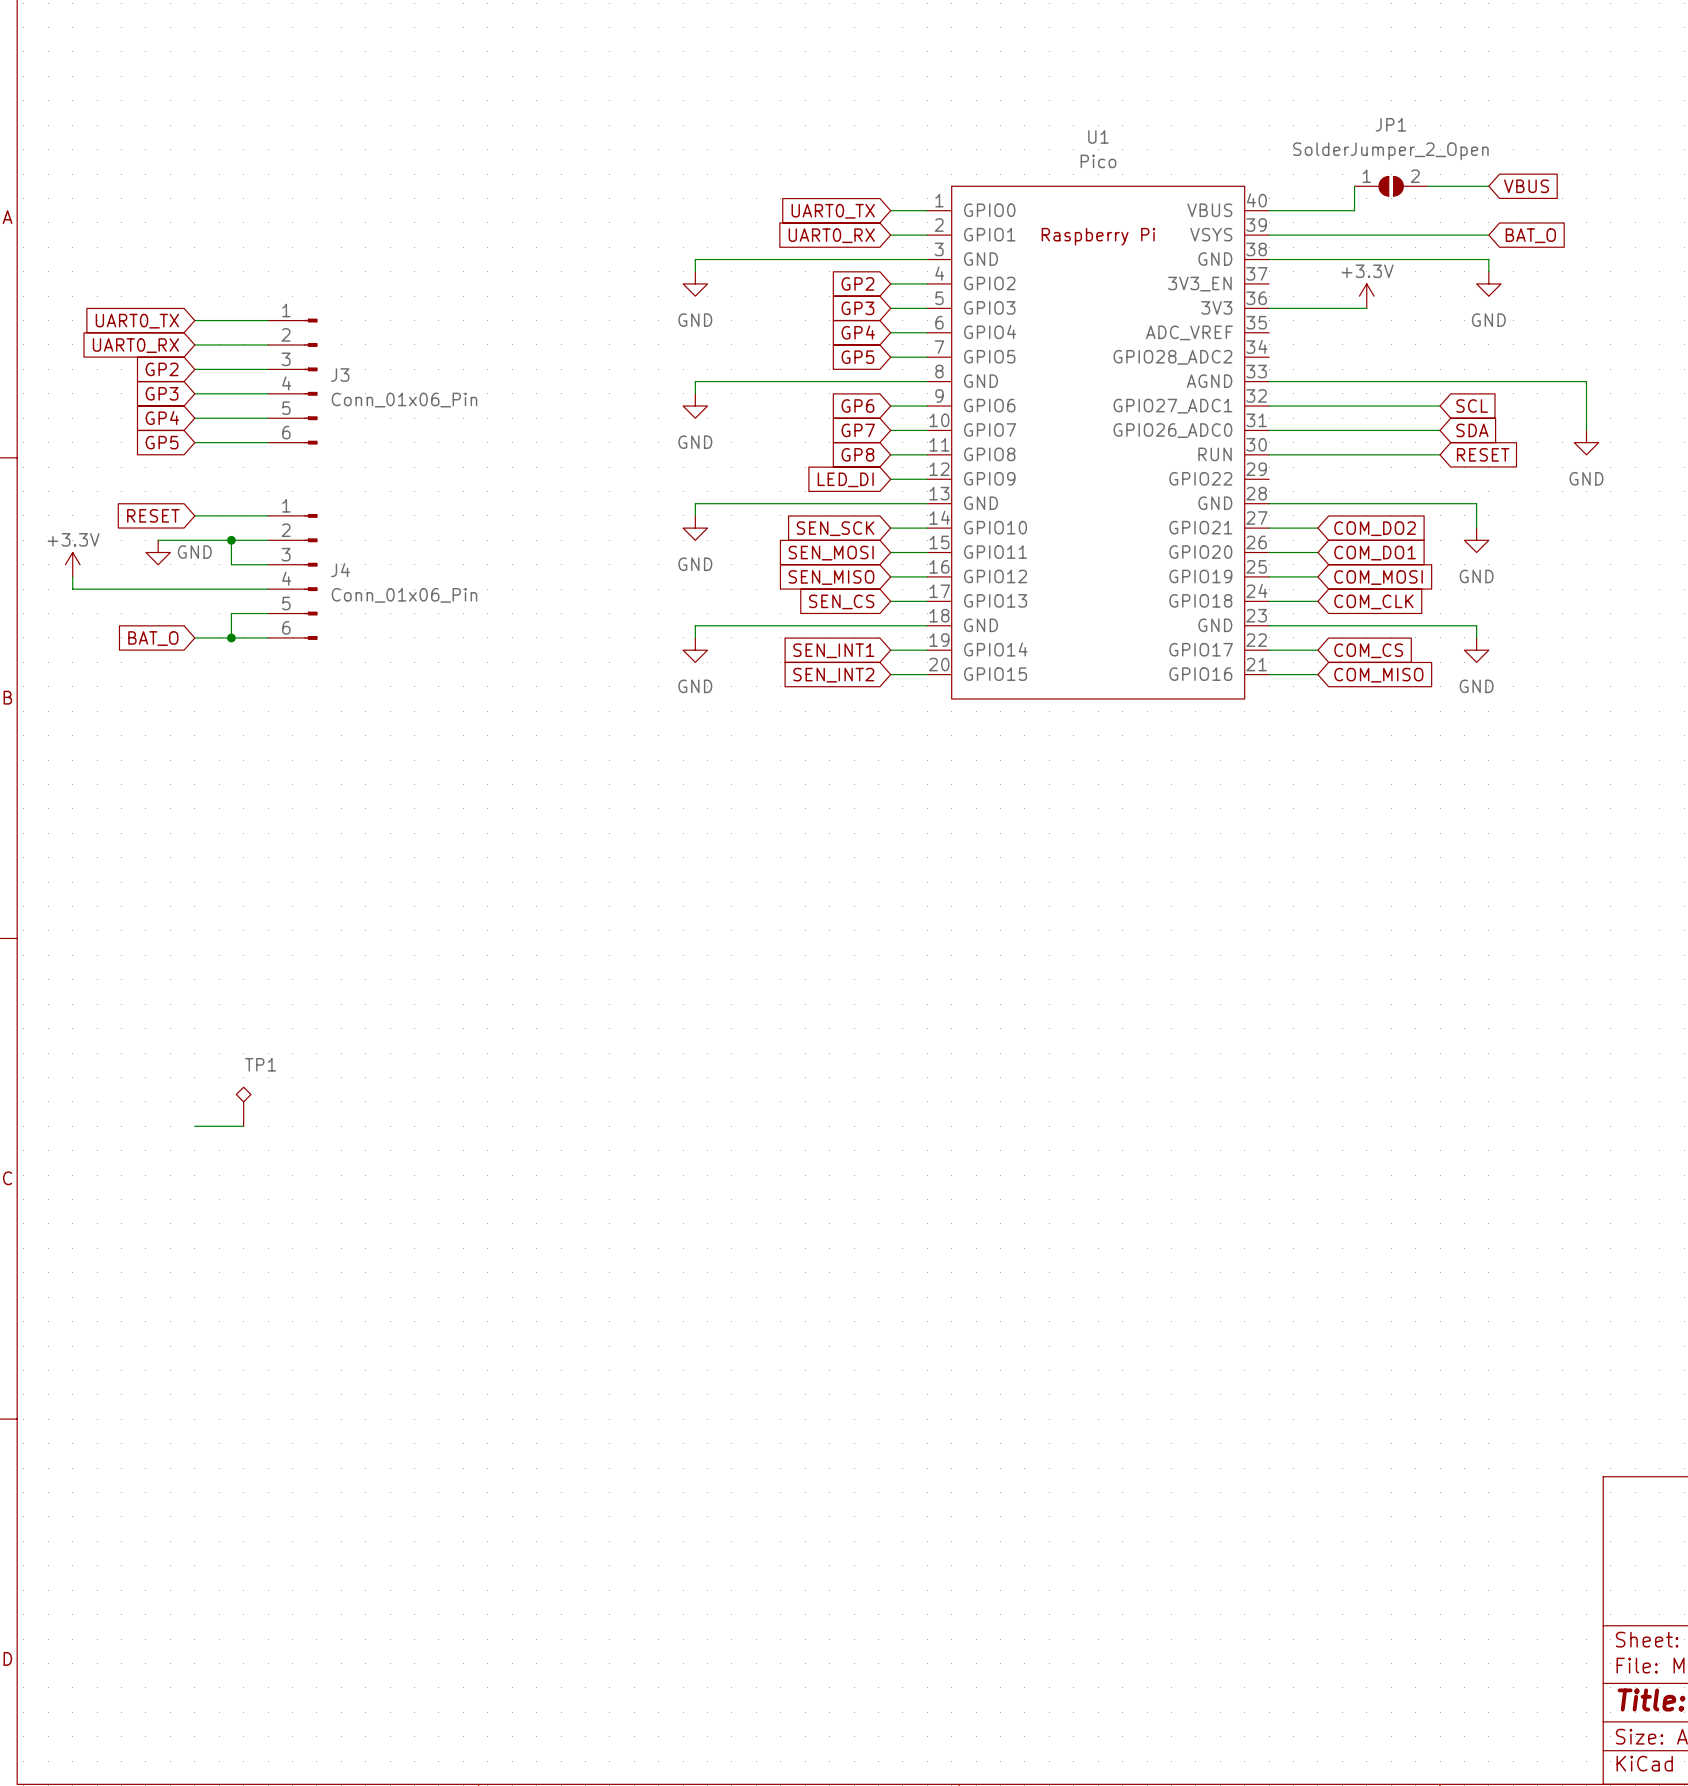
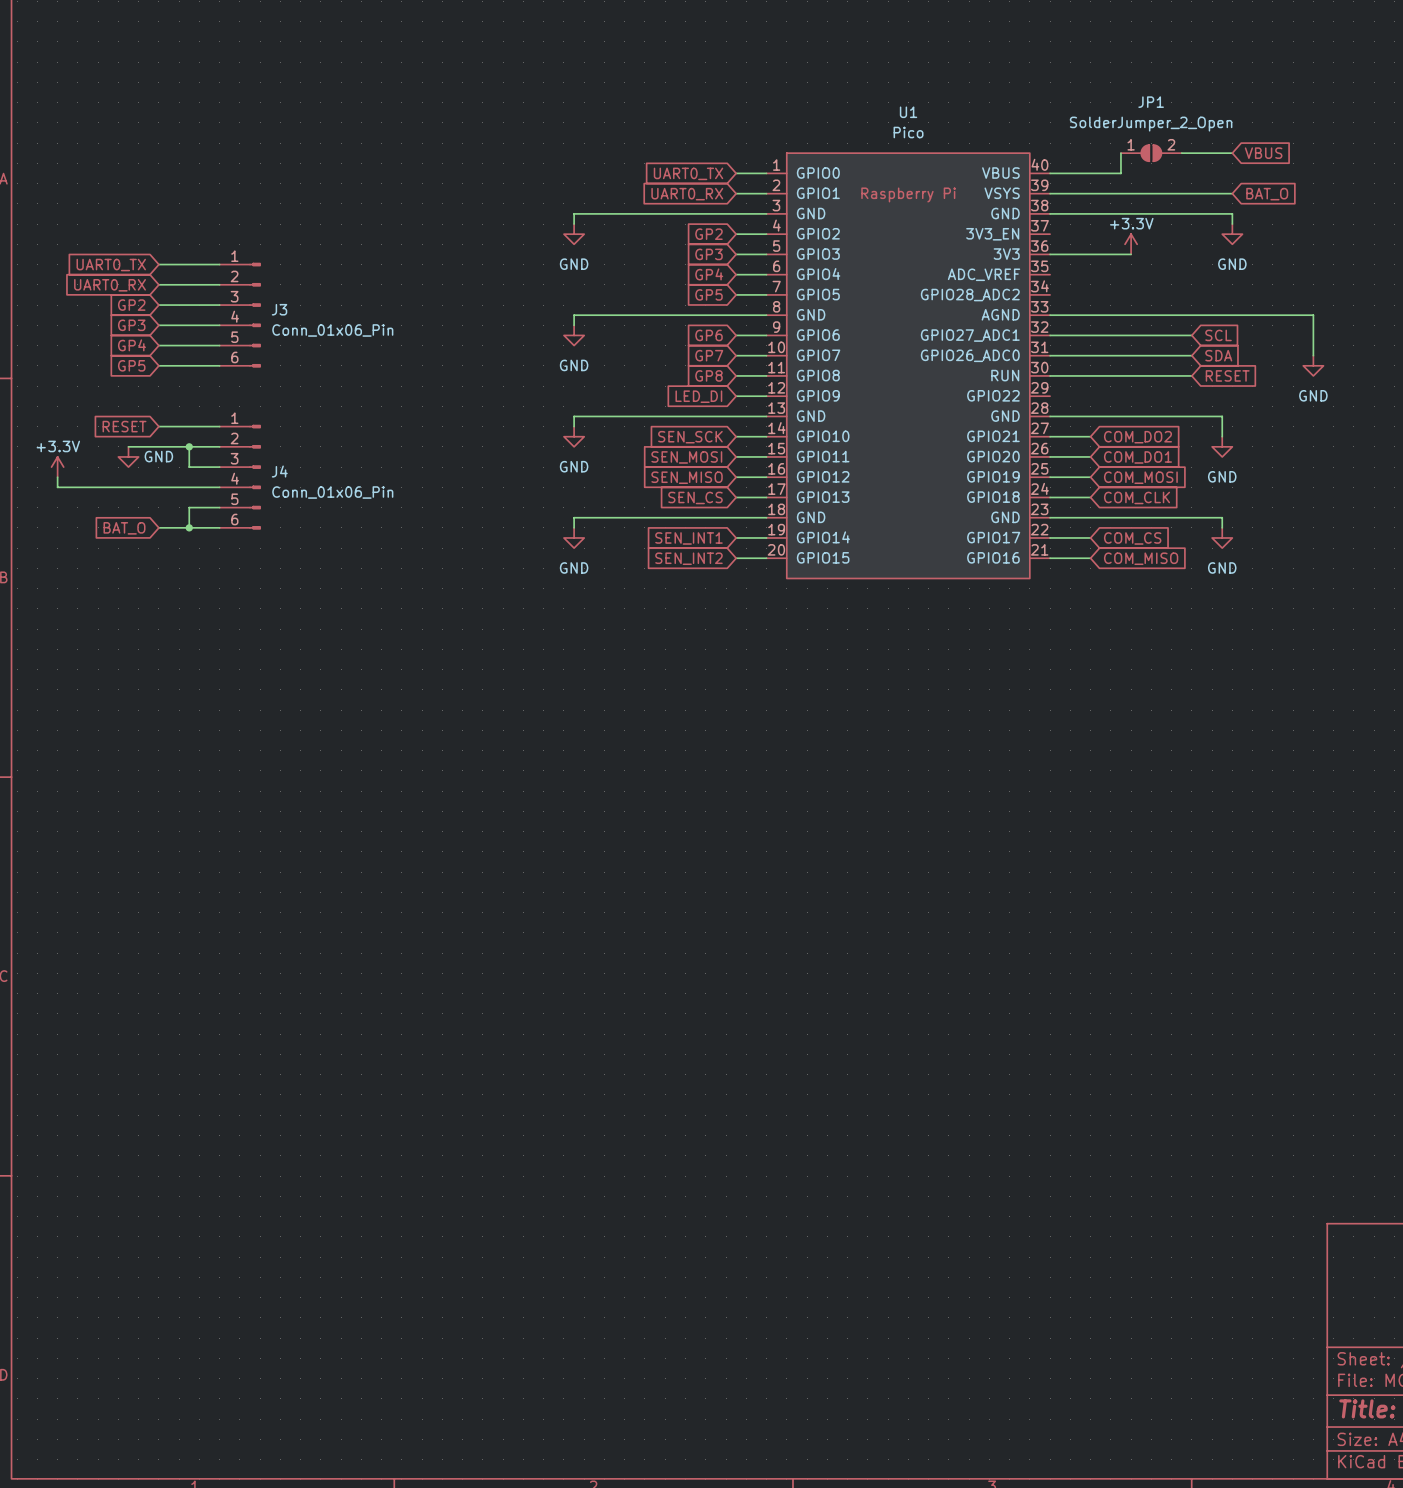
TP1: (243, 1106) -> none
wire: (194, 1126) (243, 1126) -> none

